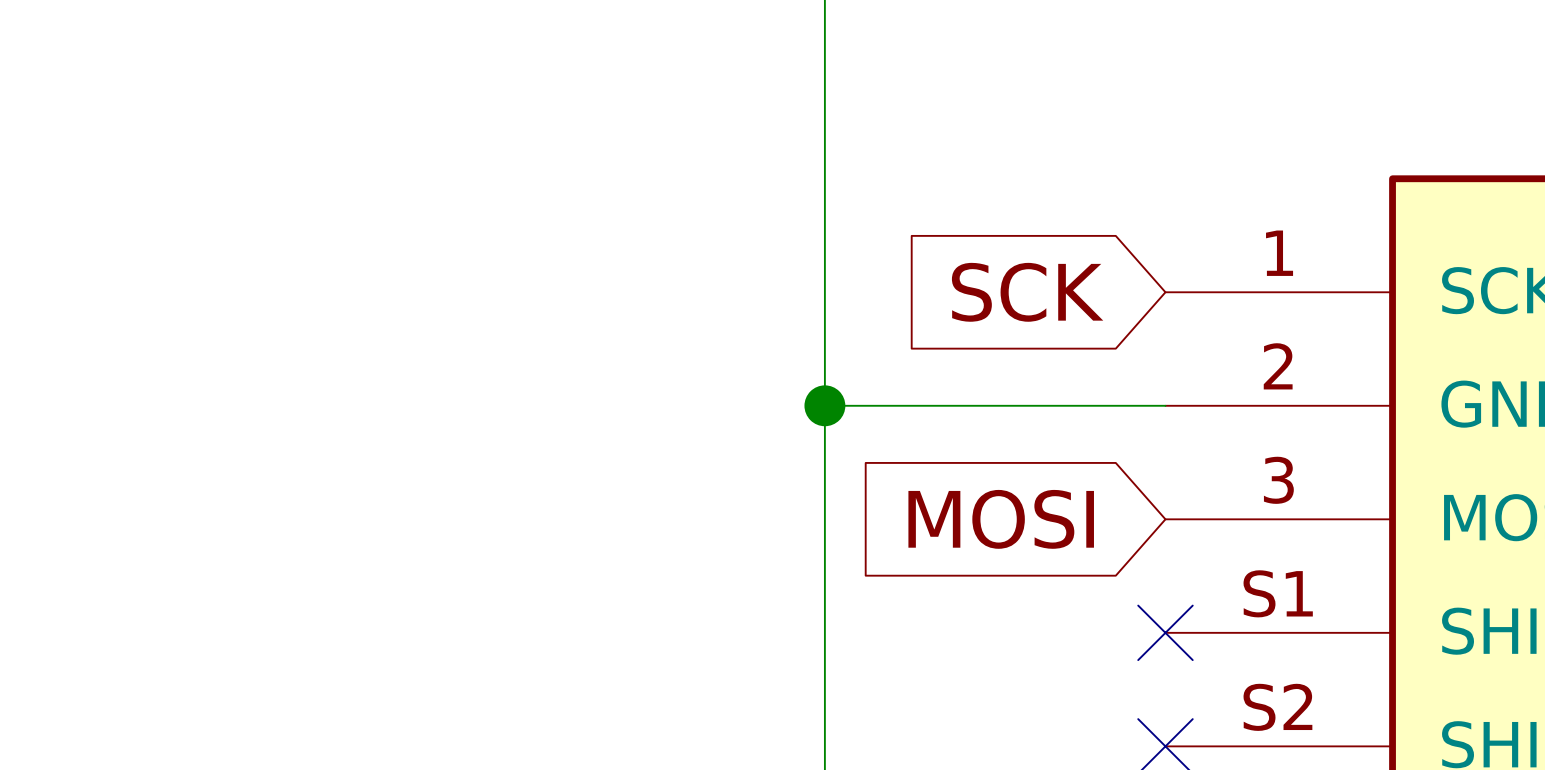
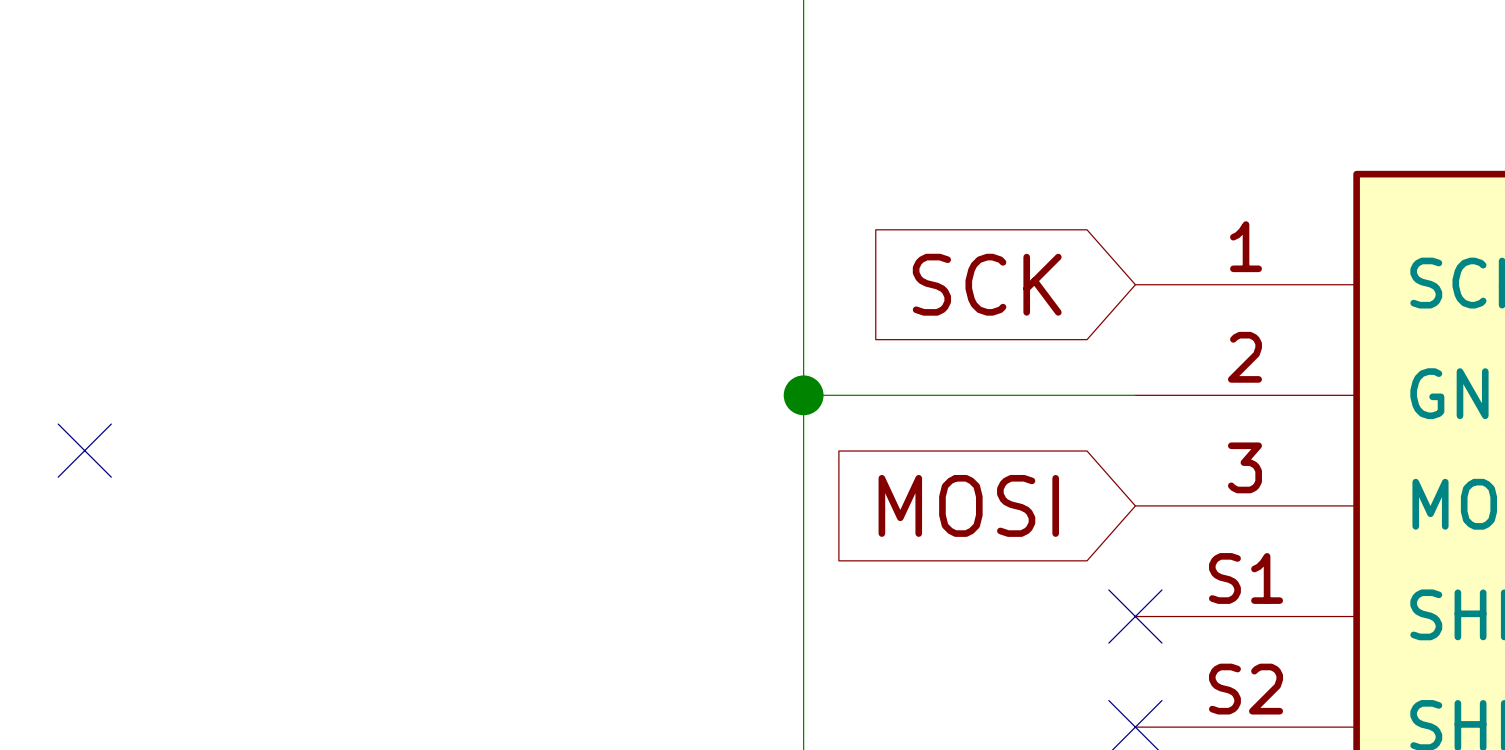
no-connect mark: none -> (84, 450)

